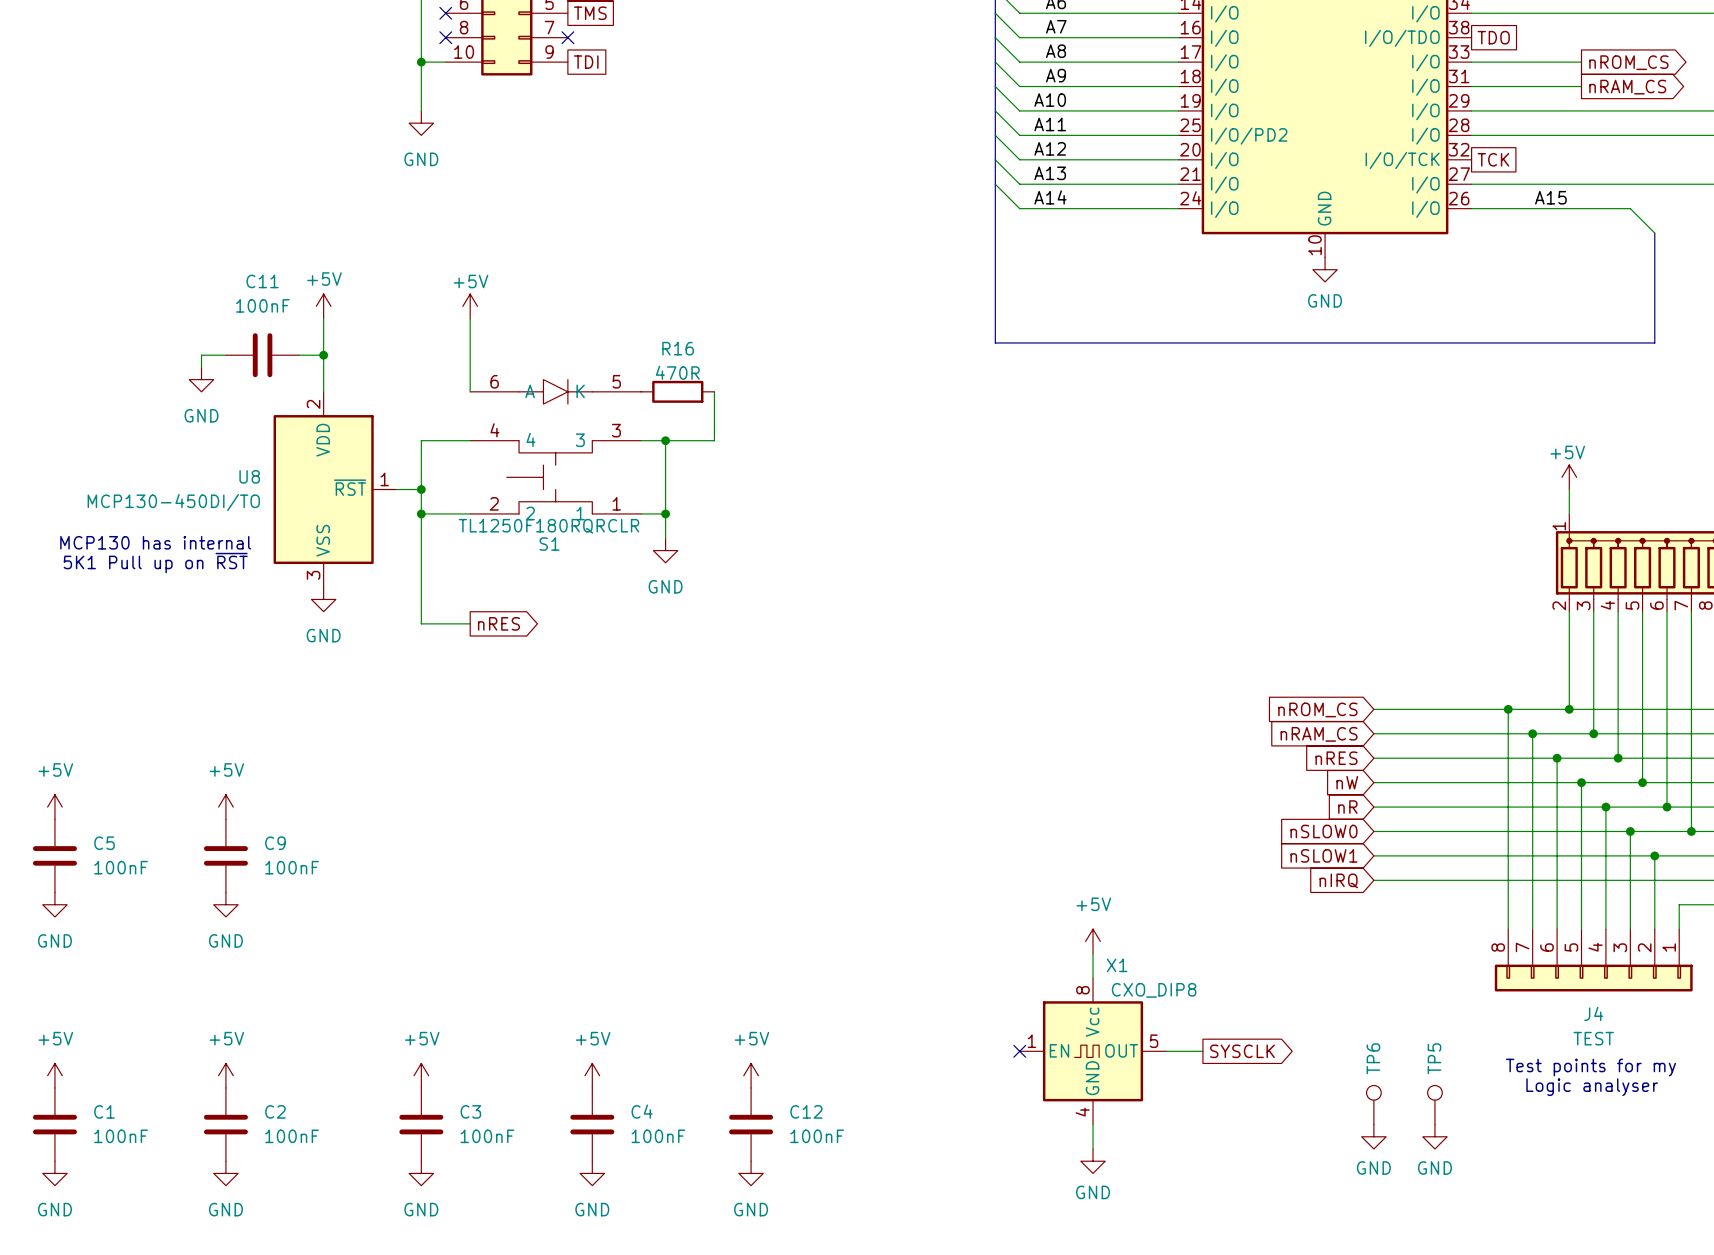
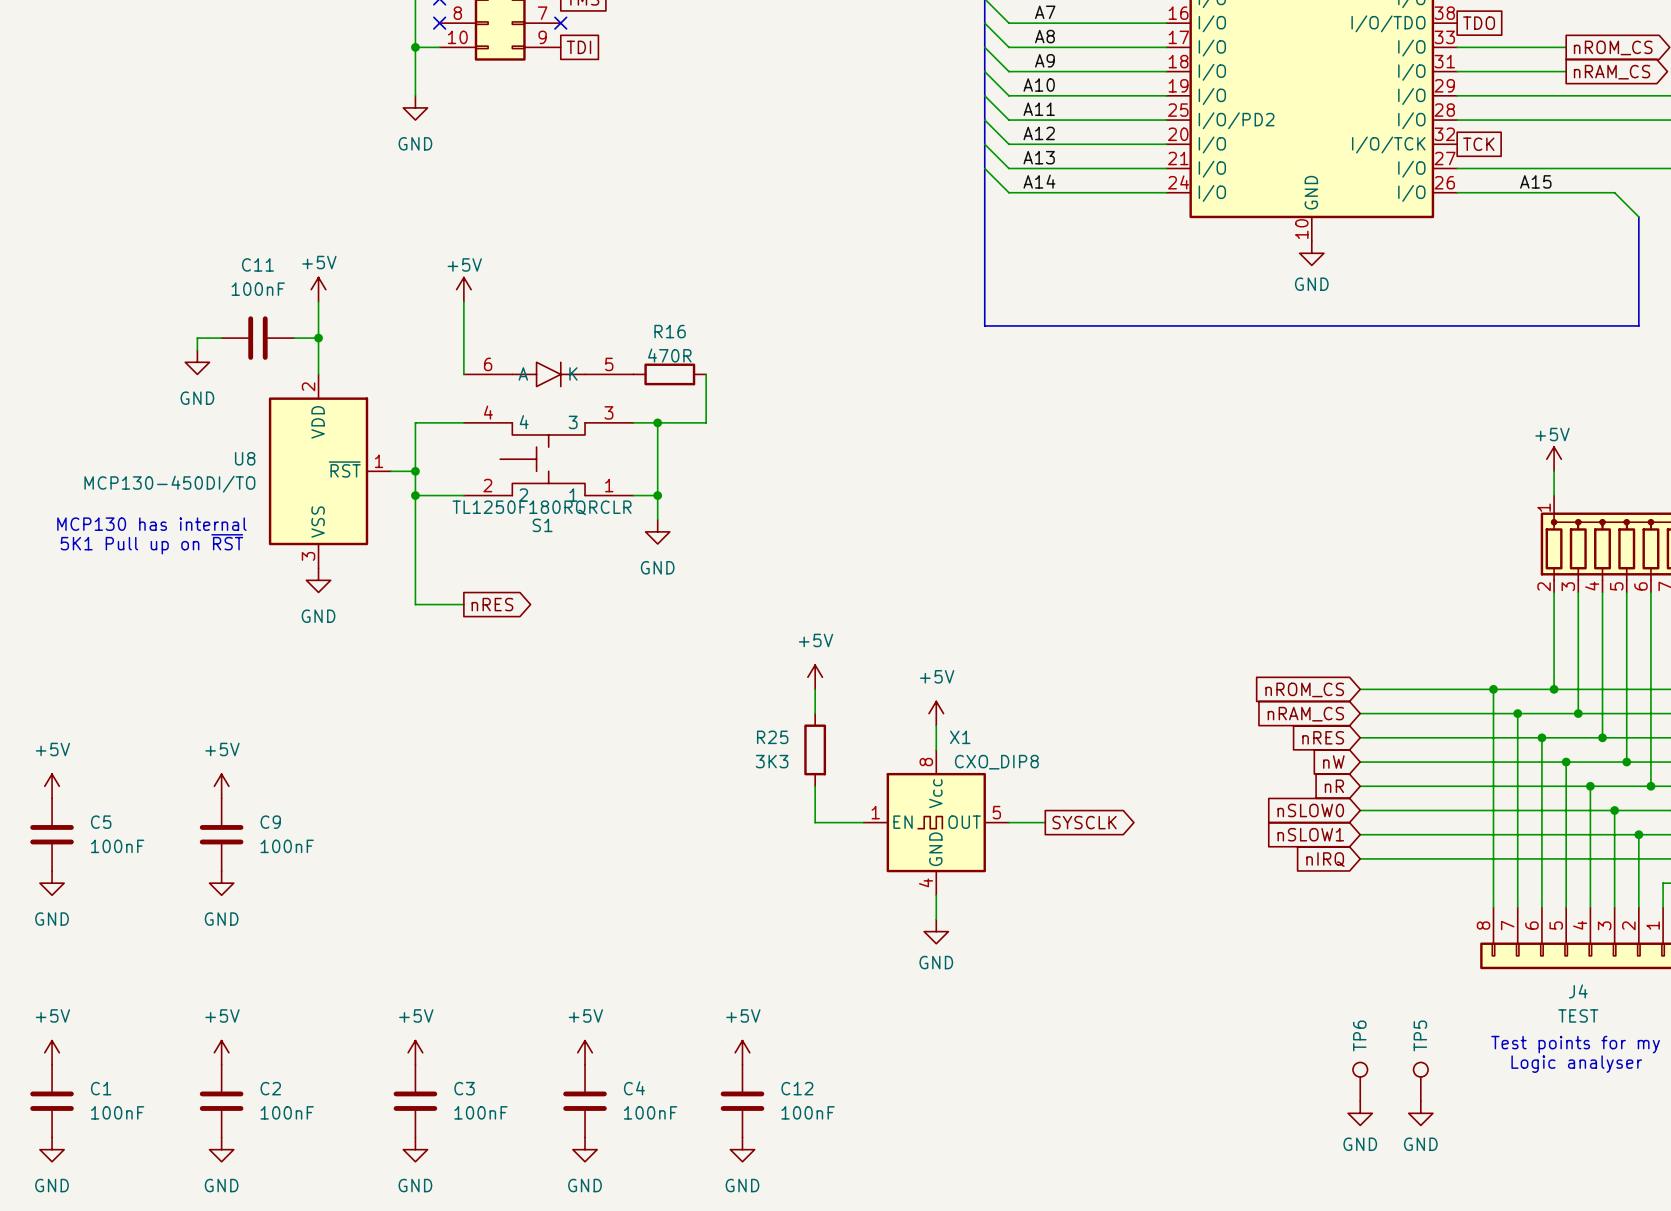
power symbol: none -> +5V (815, 677)
wire: none -> (815, 689) (815, 713)
power symbol: none -> +5V (936, 713)
wire: none -> (936, 725) (936, 749)
R25: none -> 3K3 (815, 749)
wire: none -> (815, 786) (815, 822) (863, 822)
wire: none -> (1008, 822) (1045, 822)
global label: none -> SYSCLK (1084, 822)
power symbol: +5V (1093, 941) -> none
power symbol: none -> GND (936, 931)
wire: (1093, 953) (1093, 978) -> (936, 895) (936, 919)
no-connect mark: (1019, 1051) -> none
X1 position: (1093, 1051) -> (936, 822)
wire: (1166, 1051) (1202, 1051) -> none
global label: SYSCLK (1242, 1051) -> none
wire: (1093, 1124) (1093, 1149) -> none
power symbol: GND (1093, 1161) -> none

